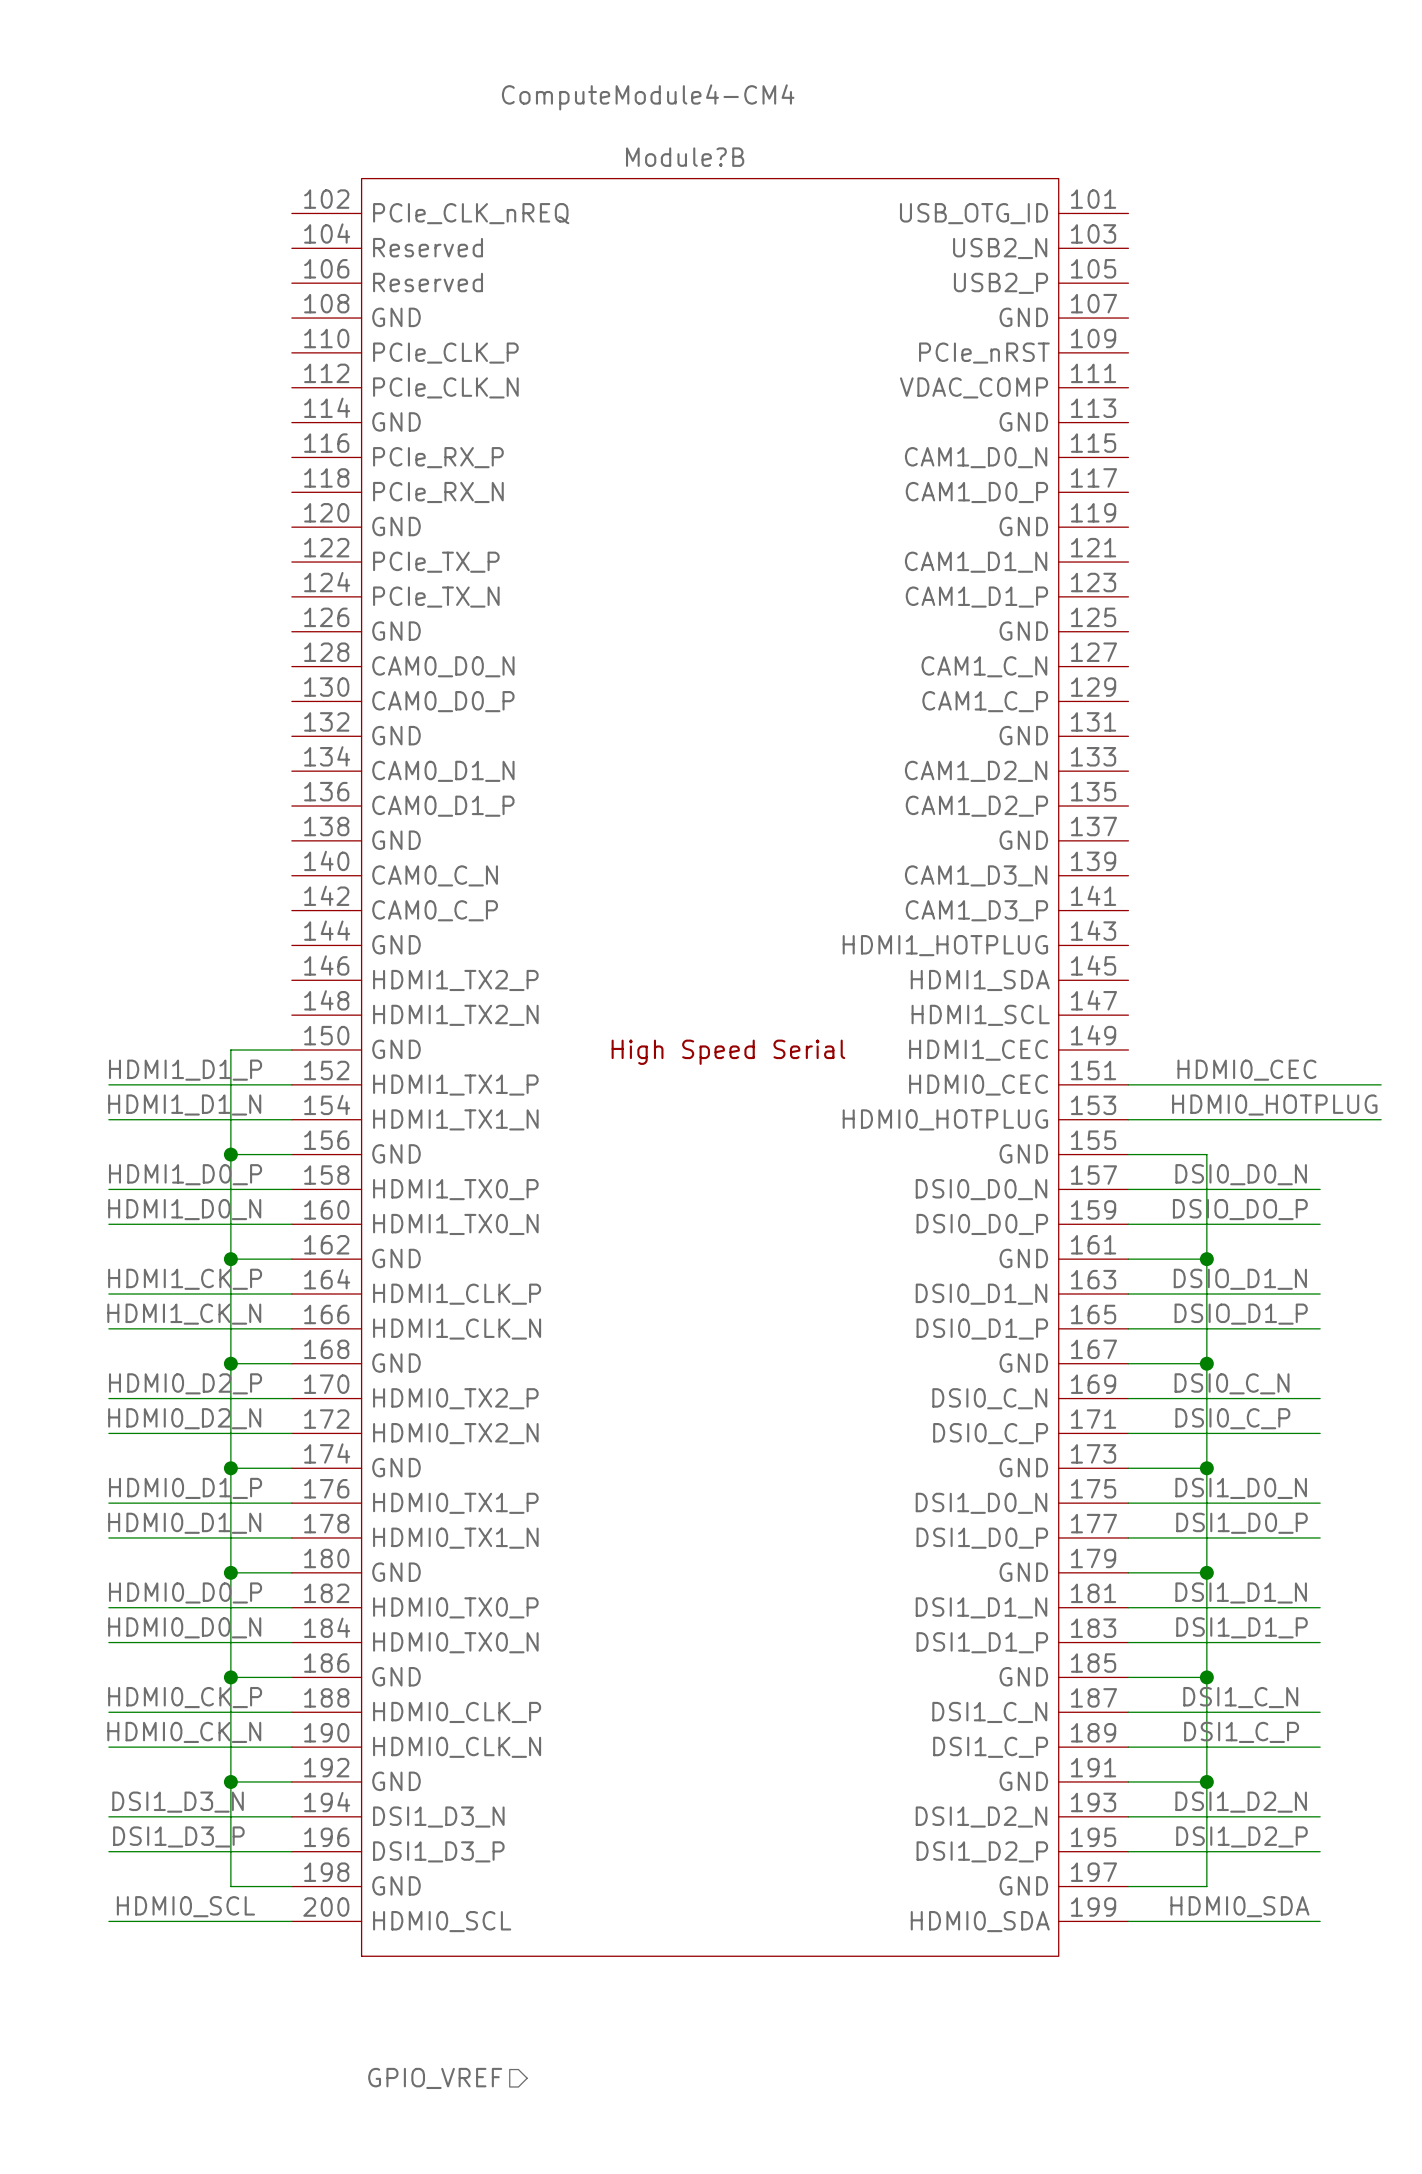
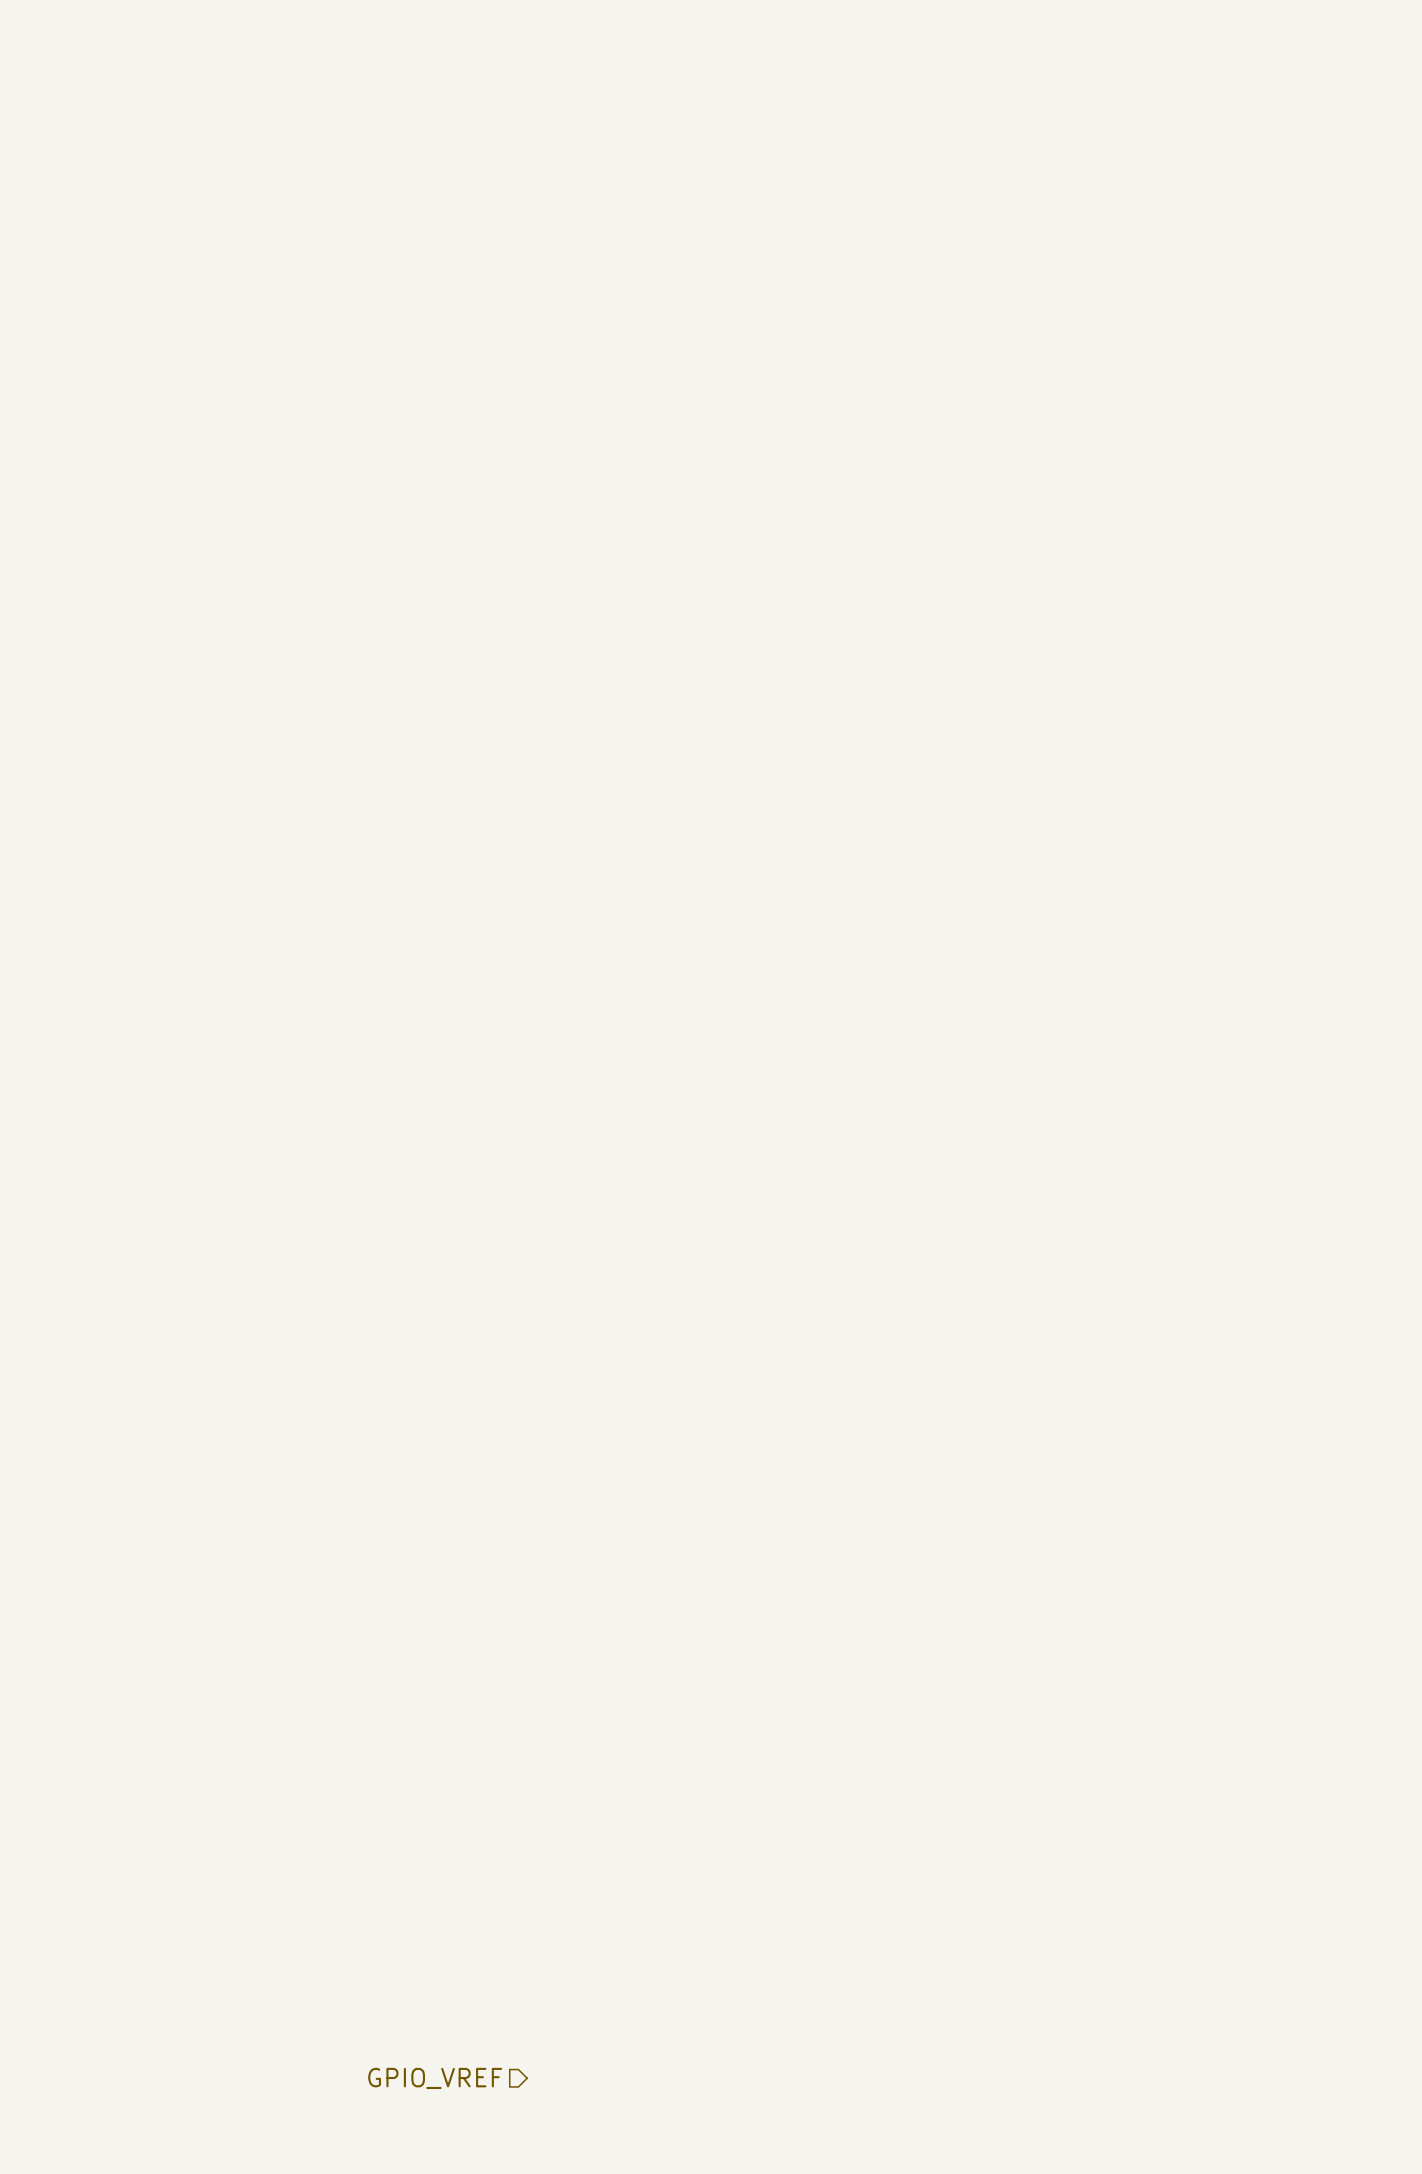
wire: (291, 1050) (230, 1050) (230, 1886) (291, 1886) -> none
Module?B: ComputeModule4-CM4 (710, 1067) -> none
label: HDMI1_D1_P (185, 1070) -> none
label: HDMI0_CEC (1246, 1070) -> none
wire: (108, 1084) (291, 1084) -> none
wire: (1128, 1084) (1381, 1084) -> none
label: HDMI1_D1_N (184, 1104) -> none
label: HDMI0_HOTPLUG (1274, 1104) -> none
wire: (108, 1119) (291, 1119) -> none
wire: (1128, 1119) (1381, 1119) -> none
wire: (230, 1154) (291, 1154) -> none
junction: (230, 1154) -> none
wire: (1128, 1154) (1206, 1154) (1206, 1886) (1128, 1886) -> none
label: HDMI1_D0_P (185, 1174) -> none
label: DSI0_D0_N (1241, 1174) -> none
wire: (108, 1189) (291, 1189) -> none
wire: (1128, 1189) (1320, 1189) -> none
label: HDMI1_D0_N (184, 1209) -> none
label: DSIO_DO_P (1240, 1209) -> none
wire: (108, 1224) (291, 1224) -> none
wire: (1128, 1224) (1320, 1224) -> none
wire: (230, 1259) (291, 1259) -> none
junction: (230, 1259) -> none
wire: (1128, 1259) (1206, 1259) -> none
junction: (1206, 1259) -> none
label: HDMI1_CK_P (185, 1279) -> none
label: DSIO_D1_N (1240, 1279) -> none
wire: (108, 1293) (291, 1293) -> none
wire: (1128, 1293) (1320, 1293) -> none
label: HDMI1_CK_N (184, 1314) -> none
label: DSIO_D1_P (1241, 1314) -> none
wire: (108, 1328) (291, 1328) -> none
wire: (1128, 1328) (1320, 1328) -> none
wire: (230, 1363) (291, 1363) -> none
junction: (230, 1363) -> none
wire: (1128, 1363) (1206, 1363) -> none
junction: (1206, 1363) -> none
label: HDMI0_D2_P (185, 1383) -> none
label: DSI0_C_N (1232, 1383) -> none
wire: (108, 1398) (291, 1398) -> none
wire: (1128, 1398) (1320, 1398) -> none
label: HDMI0_D2_N (184, 1418) -> none
label: DSI0_C_P (1232, 1418) -> none
wire: (108, 1433) (291, 1433) -> none
wire: (1128, 1433) (1320, 1433) -> none
wire: (230, 1468) (291, 1468) -> none
junction: (230, 1468) -> none
wire: (1128, 1468) (1206, 1468) -> none
junction: (1206, 1468) -> none
label: HDMI0_D1_P (185, 1488) -> none
label: DSI1_D0_N (1241, 1488) -> none
wire: (108, 1503) (291, 1503) -> none
wire: (1128, 1503) (1320, 1503) -> none
label: HDMI0_D1_N (184, 1523) -> none
label: DSI1_D0_P (1241, 1523) -> none
wire: (108, 1537) (291, 1537) -> none
wire: (1128, 1537) (1320, 1537) -> none
wire: (230, 1572) (291, 1572) -> none
junction: (230, 1572) -> none
wire: (1128, 1572) (1206, 1572) -> none
junction: (1206, 1572) -> none
label: HDMI0_D0_P (185, 1592) -> none
label: DSI1_D1_N (1241, 1592) -> none
wire: (108, 1607) (291, 1607) -> none
wire: (1128, 1607) (1320, 1607) -> none
label: HDMI0_D0_N (184, 1627) -> none
label: DSI1_D1_P (1241, 1627) -> none
wire: (108, 1642) (291, 1642) -> none
wire: (1128, 1642) (1320, 1642) -> none
wire: (230, 1677) (291, 1677) -> none
junction: (230, 1677) -> none
wire: (1128, 1677) (1206, 1677) -> none
junction: (1206, 1677) -> none
label: HDMI0_CK_P (185, 1697) -> none
label: DSI1_C_N (1240, 1697) -> none
wire: (108, 1712) (291, 1712) -> none
wire: (1128, 1712) (1320, 1712) -> none
label: HDMI0_CK_N (184, 1732) -> none
label: DSI1_C_P (1241, 1732) -> none
wire: (108, 1747) (291, 1747) -> none
wire: (1128, 1747) (1320, 1747) -> none
wire: (230, 1781) (291, 1781) -> none
junction: (230, 1781) -> none
wire: (1128, 1781) (1206, 1781) -> none
junction: (1206, 1781) -> none
label: DSI1_D3_N (178, 1802) -> none
label: DSI1_D2_N (1241, 1802) -> none
wire: (108, 1816) (291, 1816) -> none
wire: (1128, 1816) (1320, 1816) -> none
label: DSI1_D3_P (178, 1836) -> none
label: DSI1_D2_P (1241, 1836) -> none
wire: (108, 1851) (291, 1851) -> none
wire: (1128, 1851) (1320, 1851) -> none
label: HDMI0_SCL (185, 1906) -> none
label: HDMI0_SDA (1239, 1906) -> none
wire: (108, 1921) (291, 1921) -> none
wire: (1128, 1921) (1320, 1921) -> none

